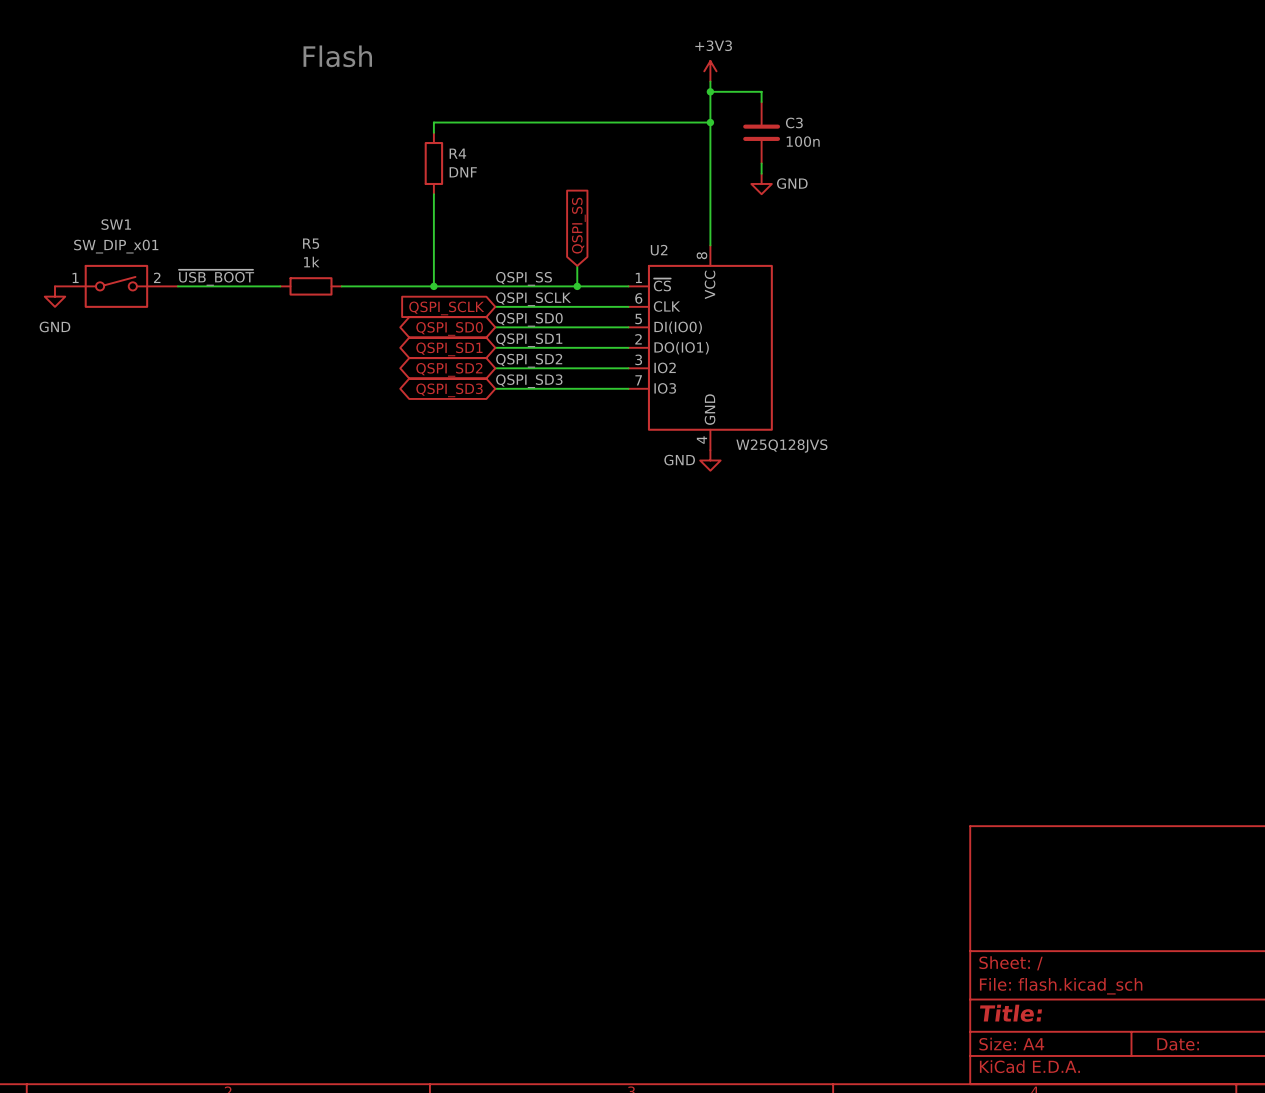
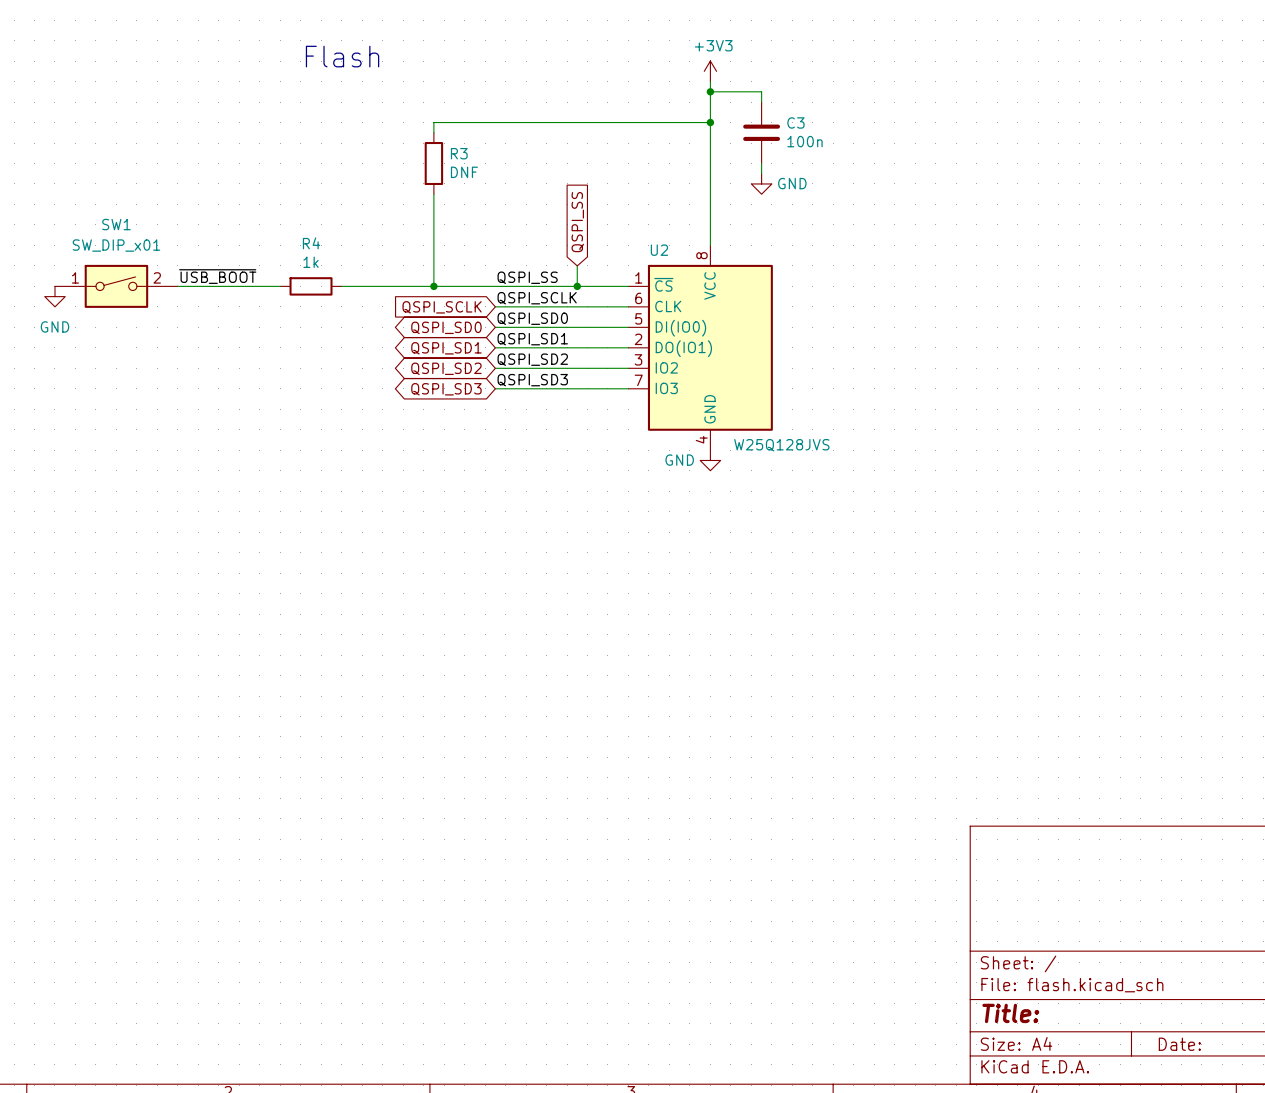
R4 name: R4 (457, 153) -> R3 (459, 153)
R5 name: R5 (311, 243) -> R4 (311, 243)

